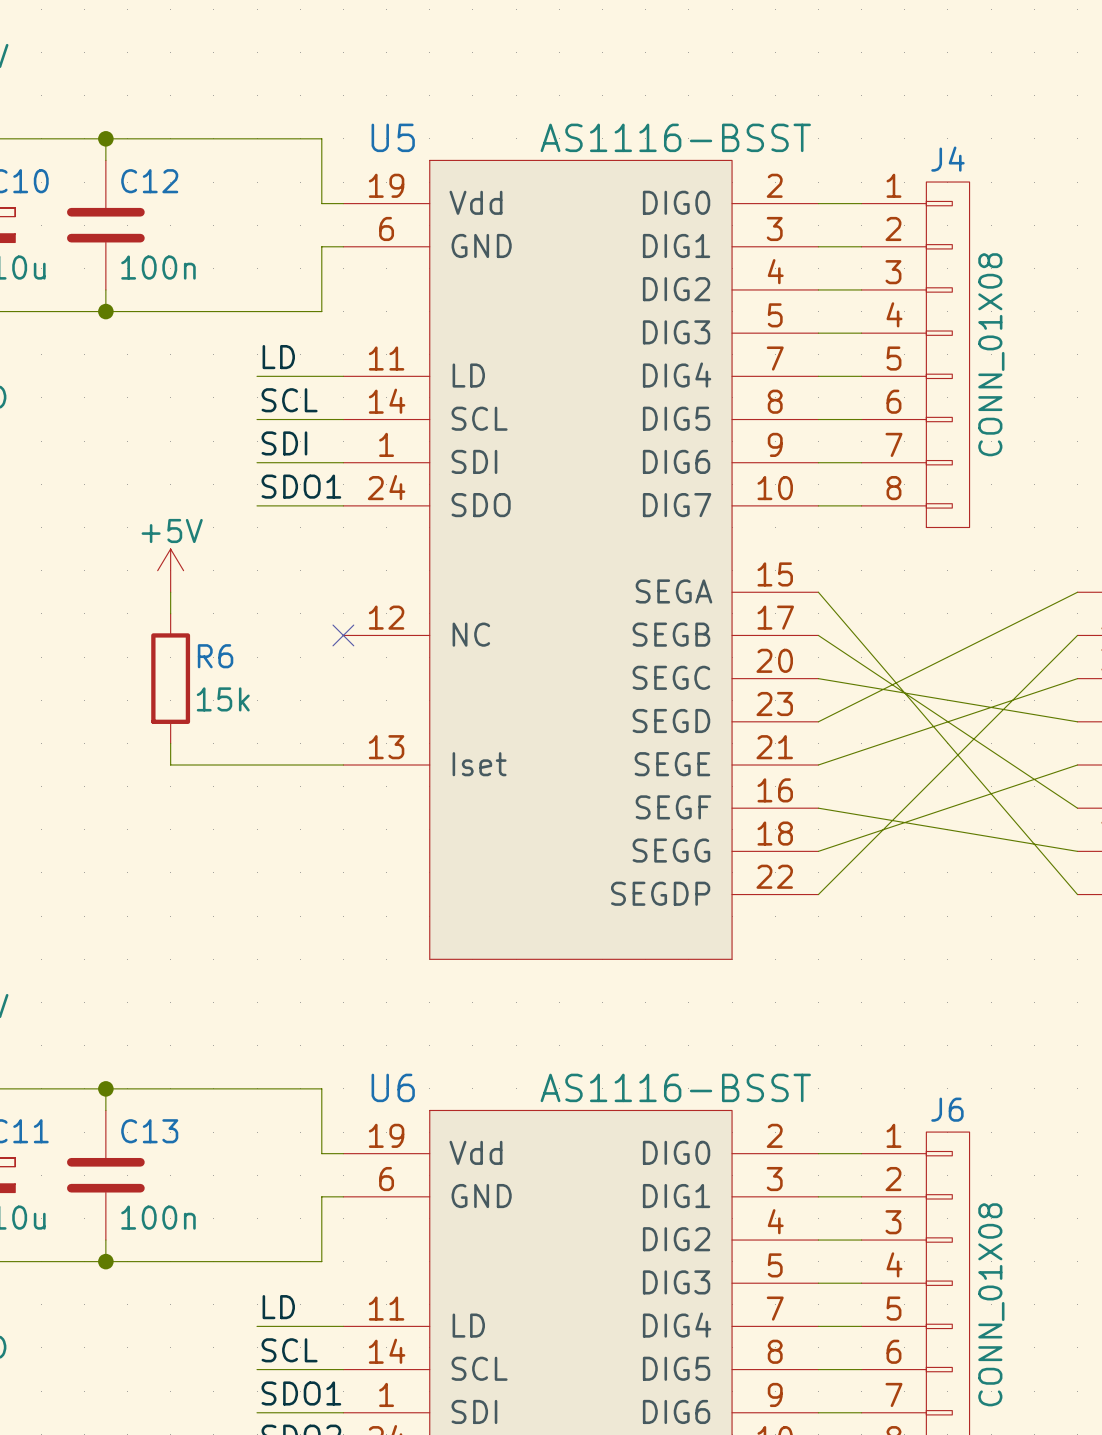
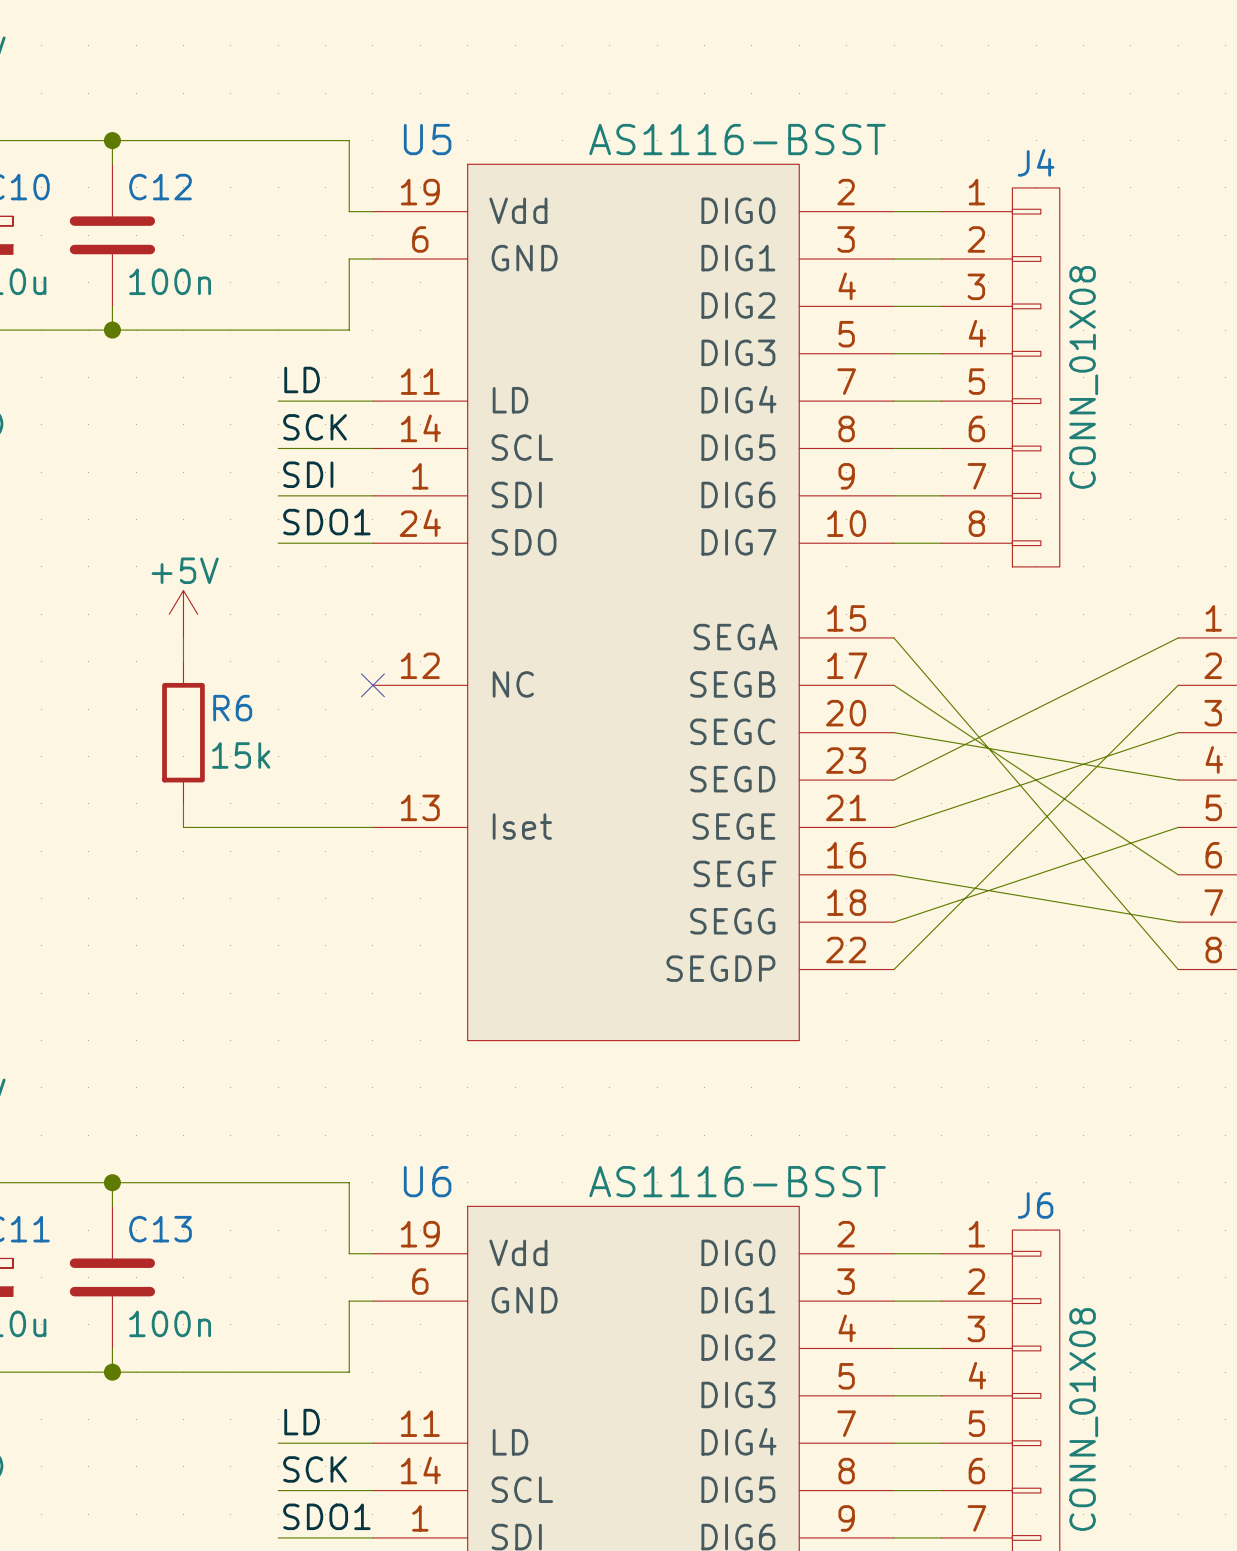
label: SCL (289, 400) -> SCK (315, 427)
label: SCL (289, 1350) -> SCK (315, 1469)

